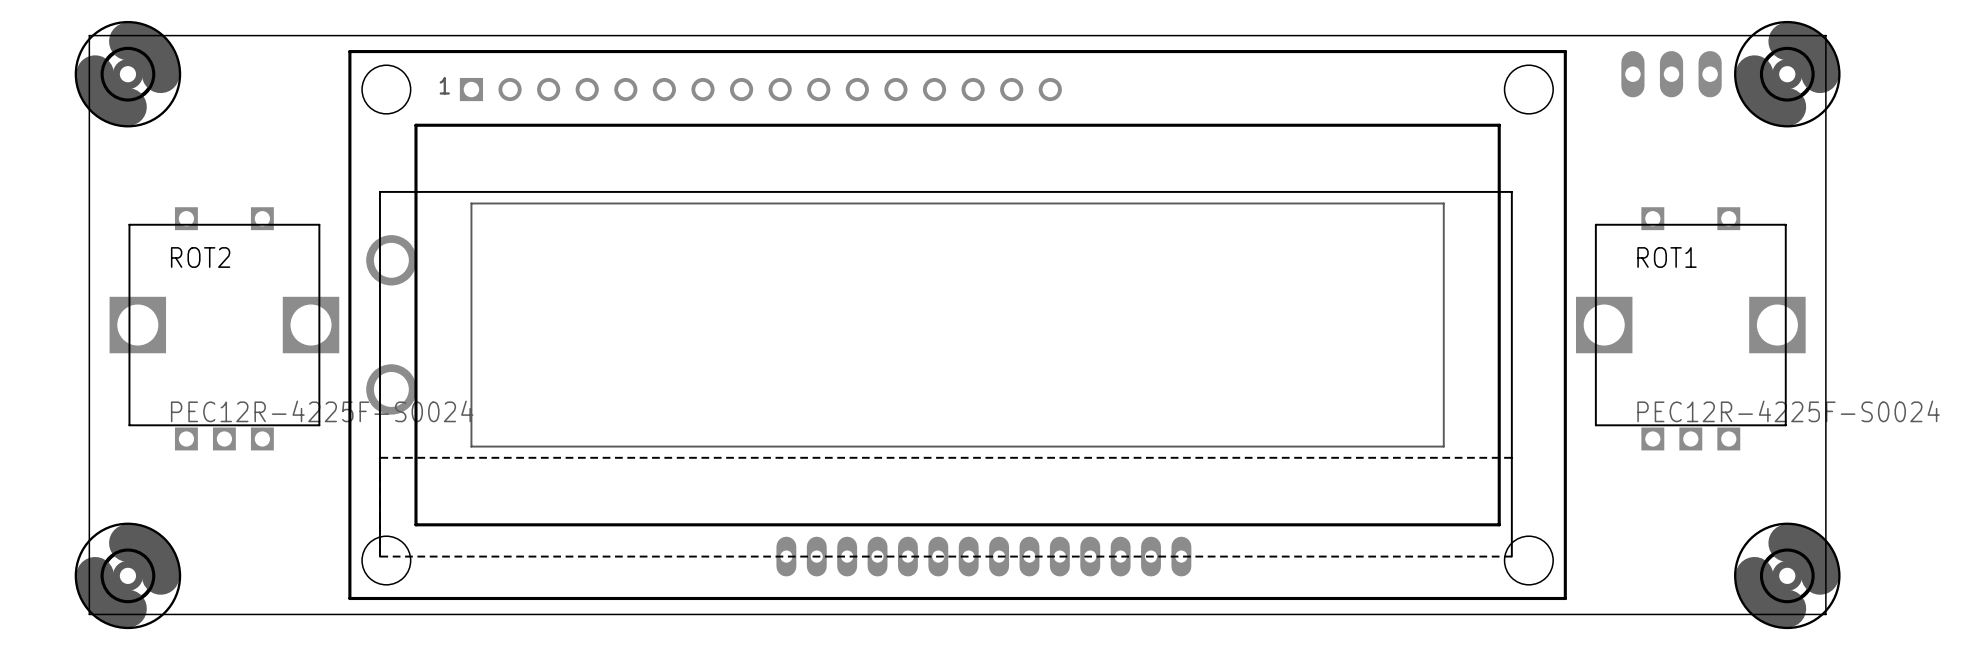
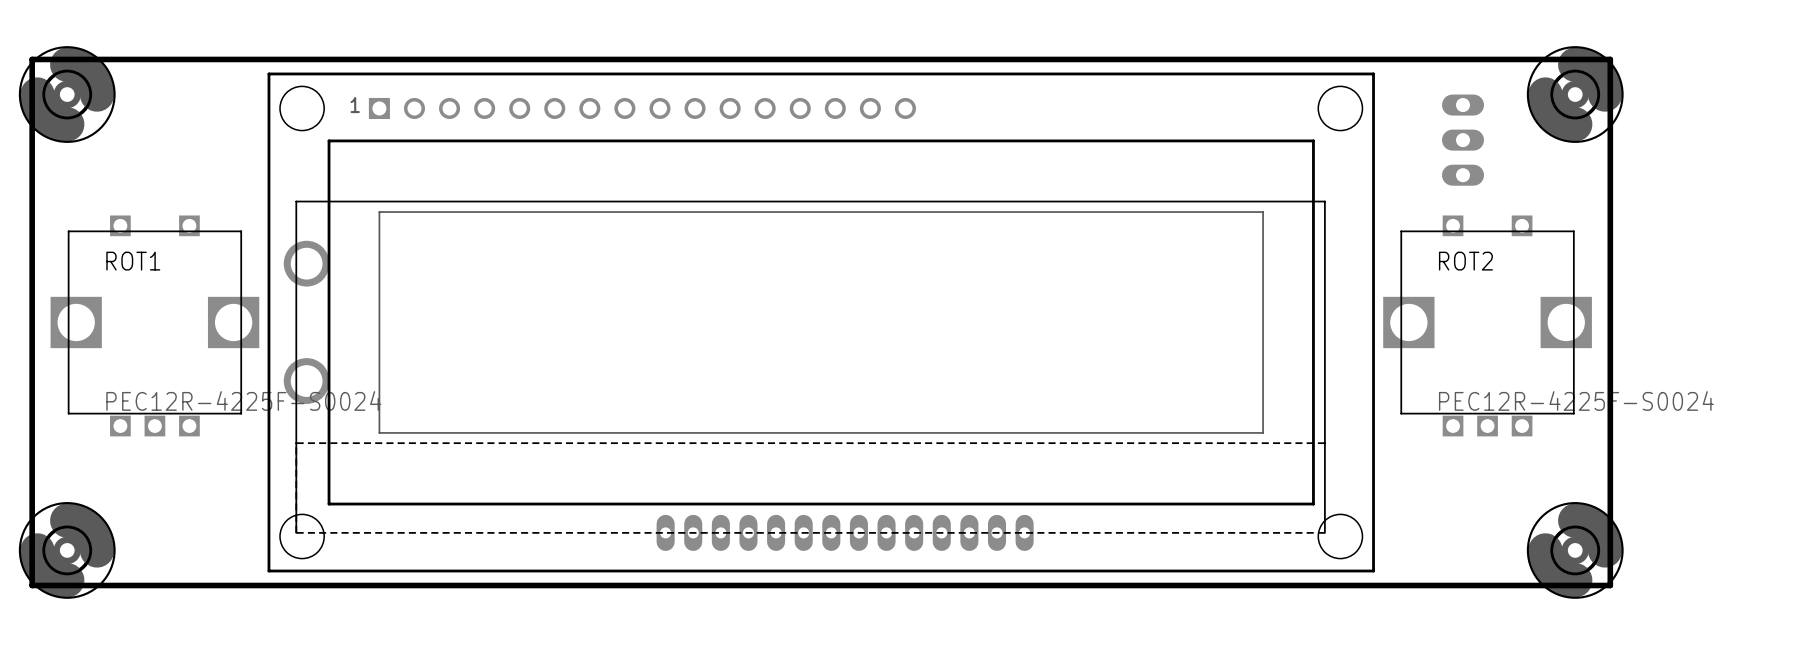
board edge width: thin (89, 35) (1825, 35) (1825, 614) (89, 614) (89, 35) -> thick (32, 59) (1610, 59) (1610, 585) (32, 585) (32, 59)
part rotation: 0° (1671, 74) -> 90° clockwise (1463, 140)
ROT2 name: ROT2 (200, 257) -> ROT1 (133, 261)
ROT1 name: ROT1 (1667, 257) -> ROT2 (1465, 261)

